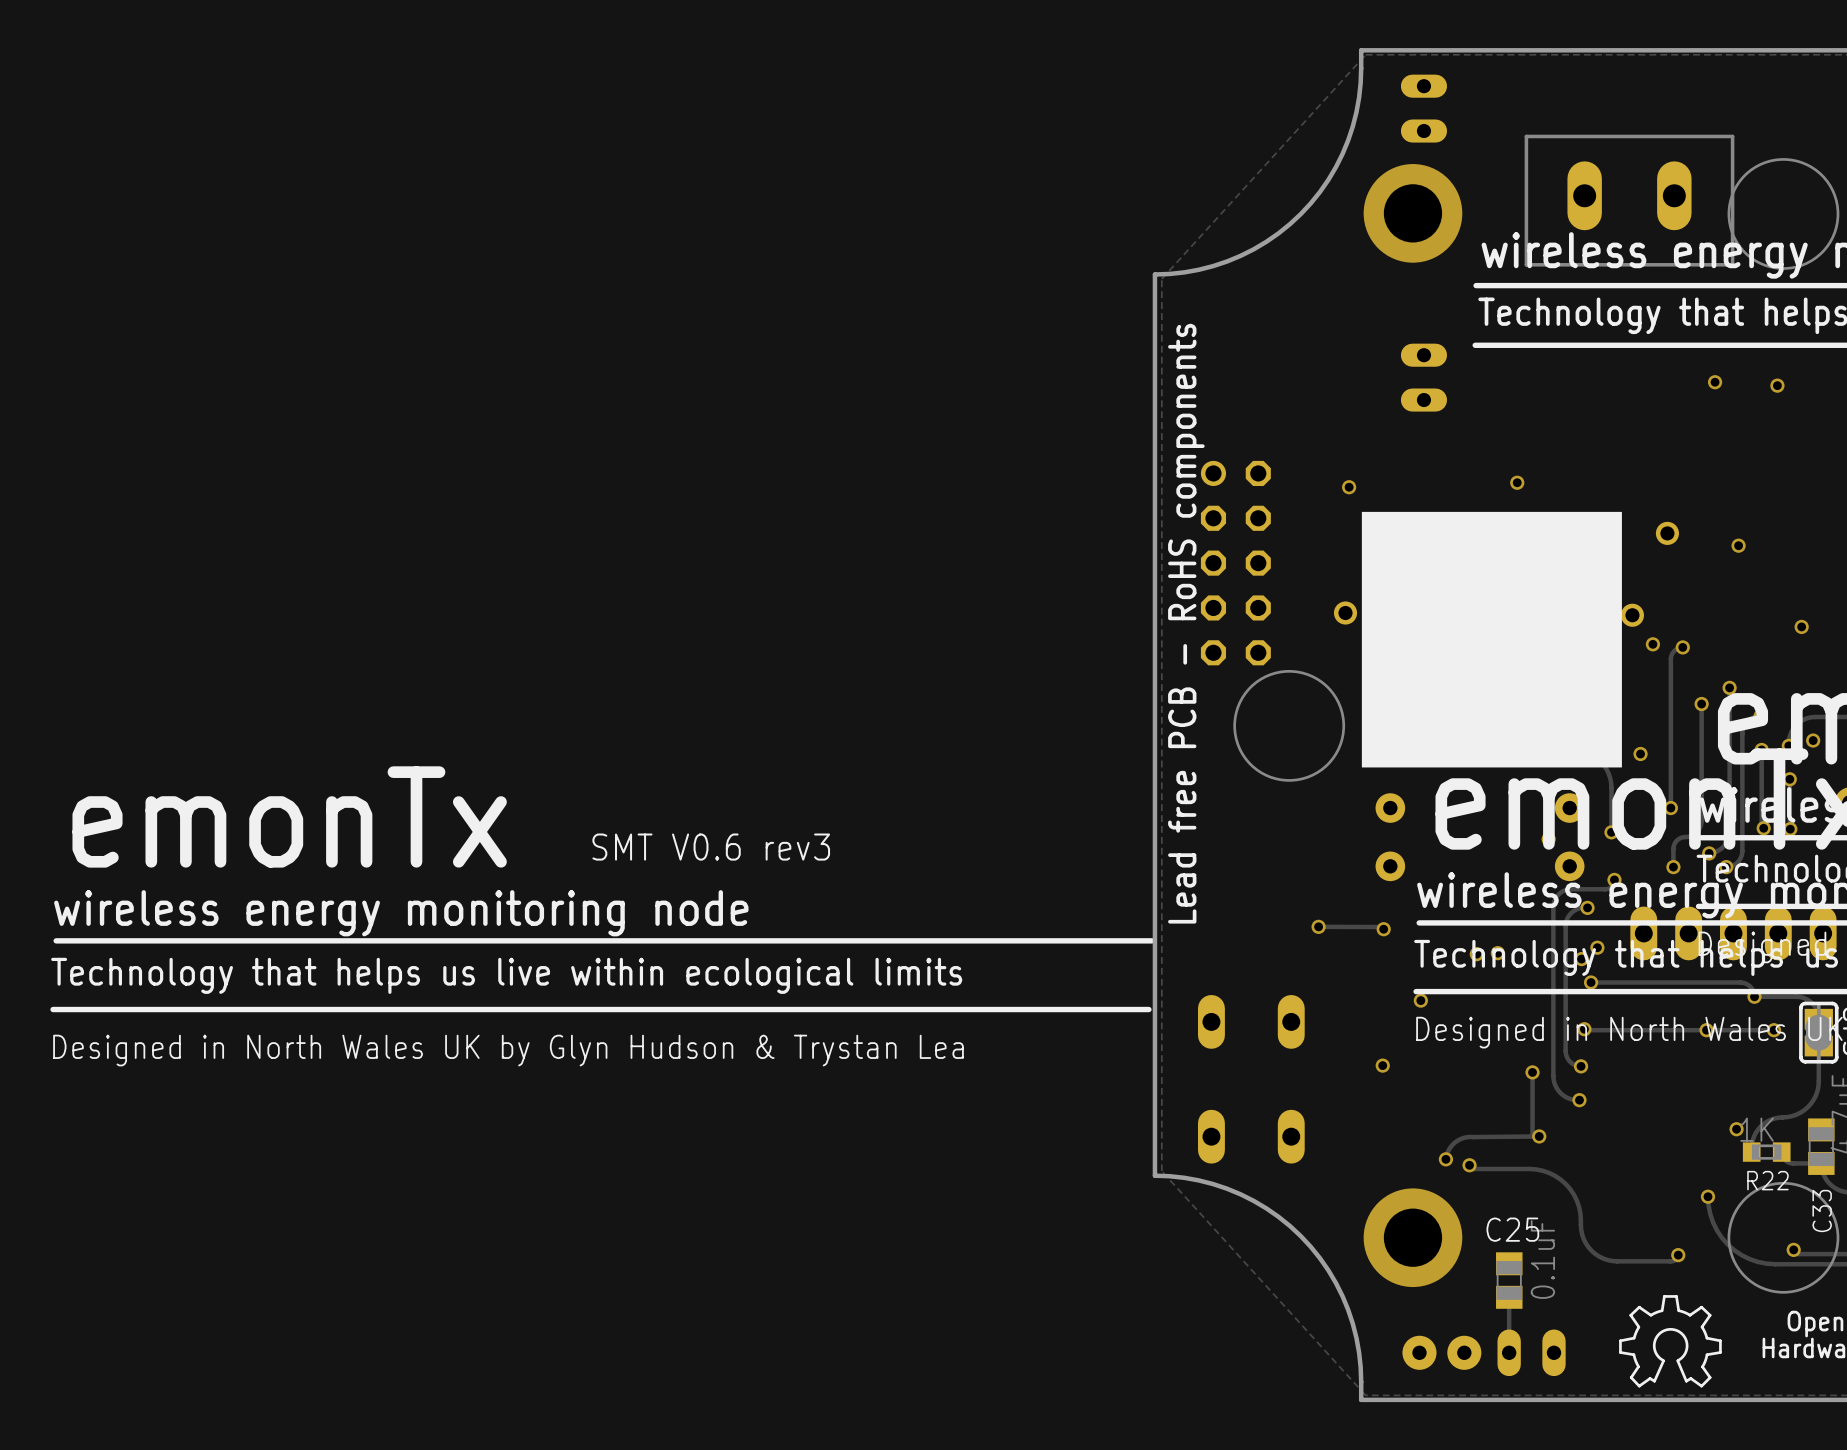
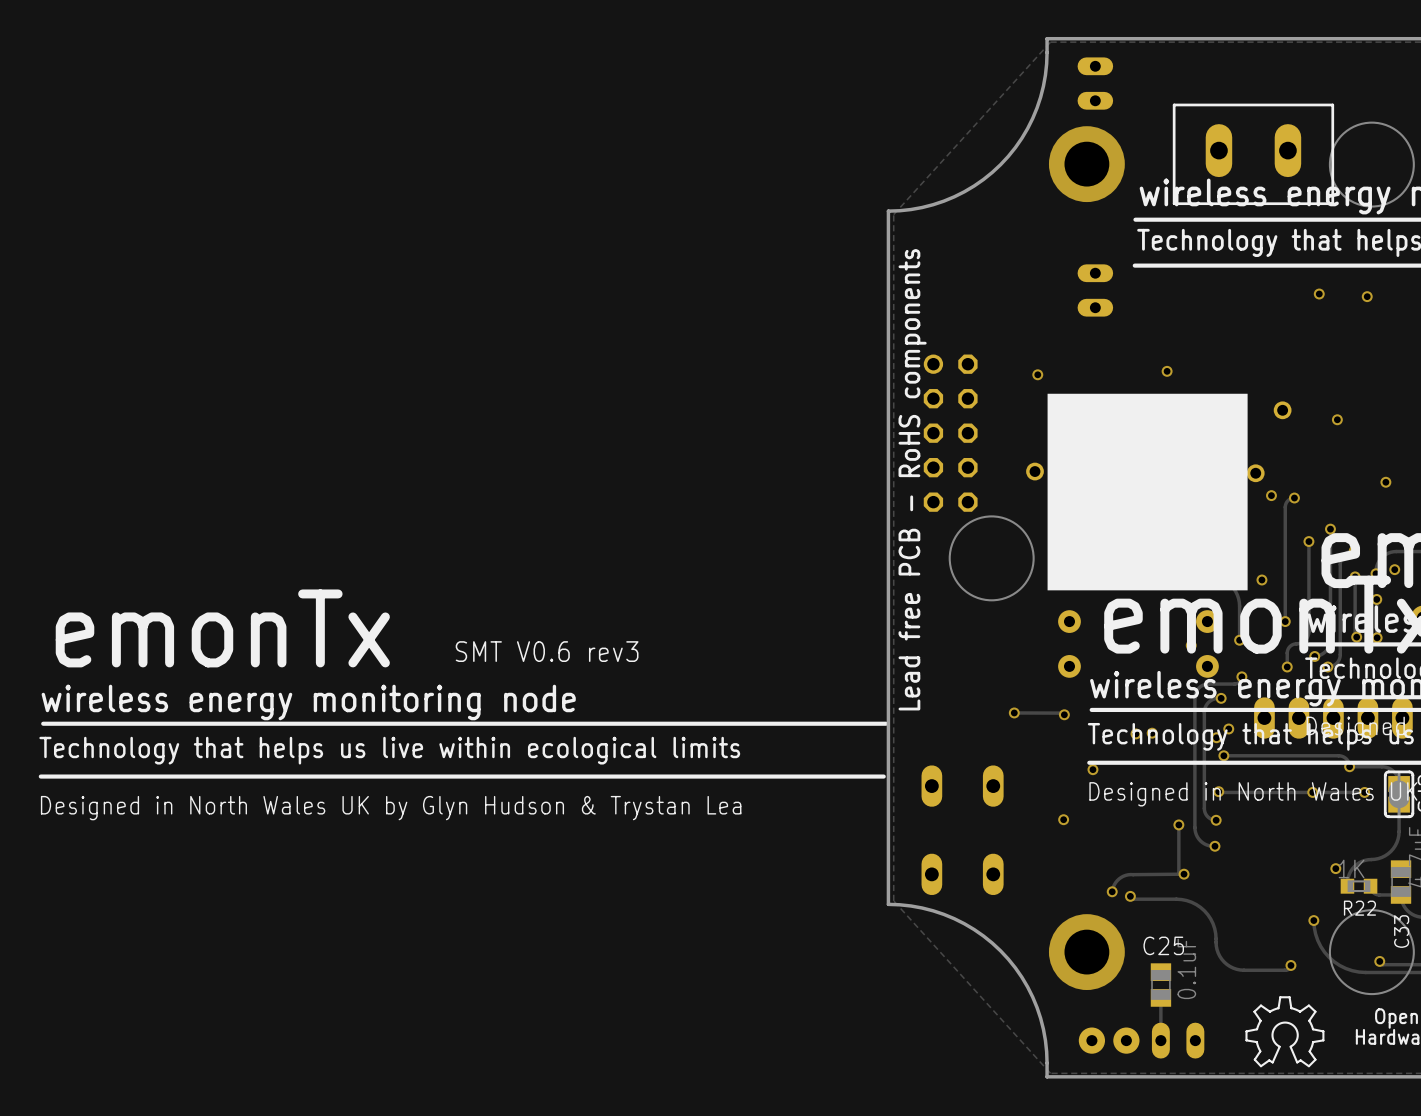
part footprint: [1524, 134, 1735, 267] -> [1172, 103, 1335, 206]

